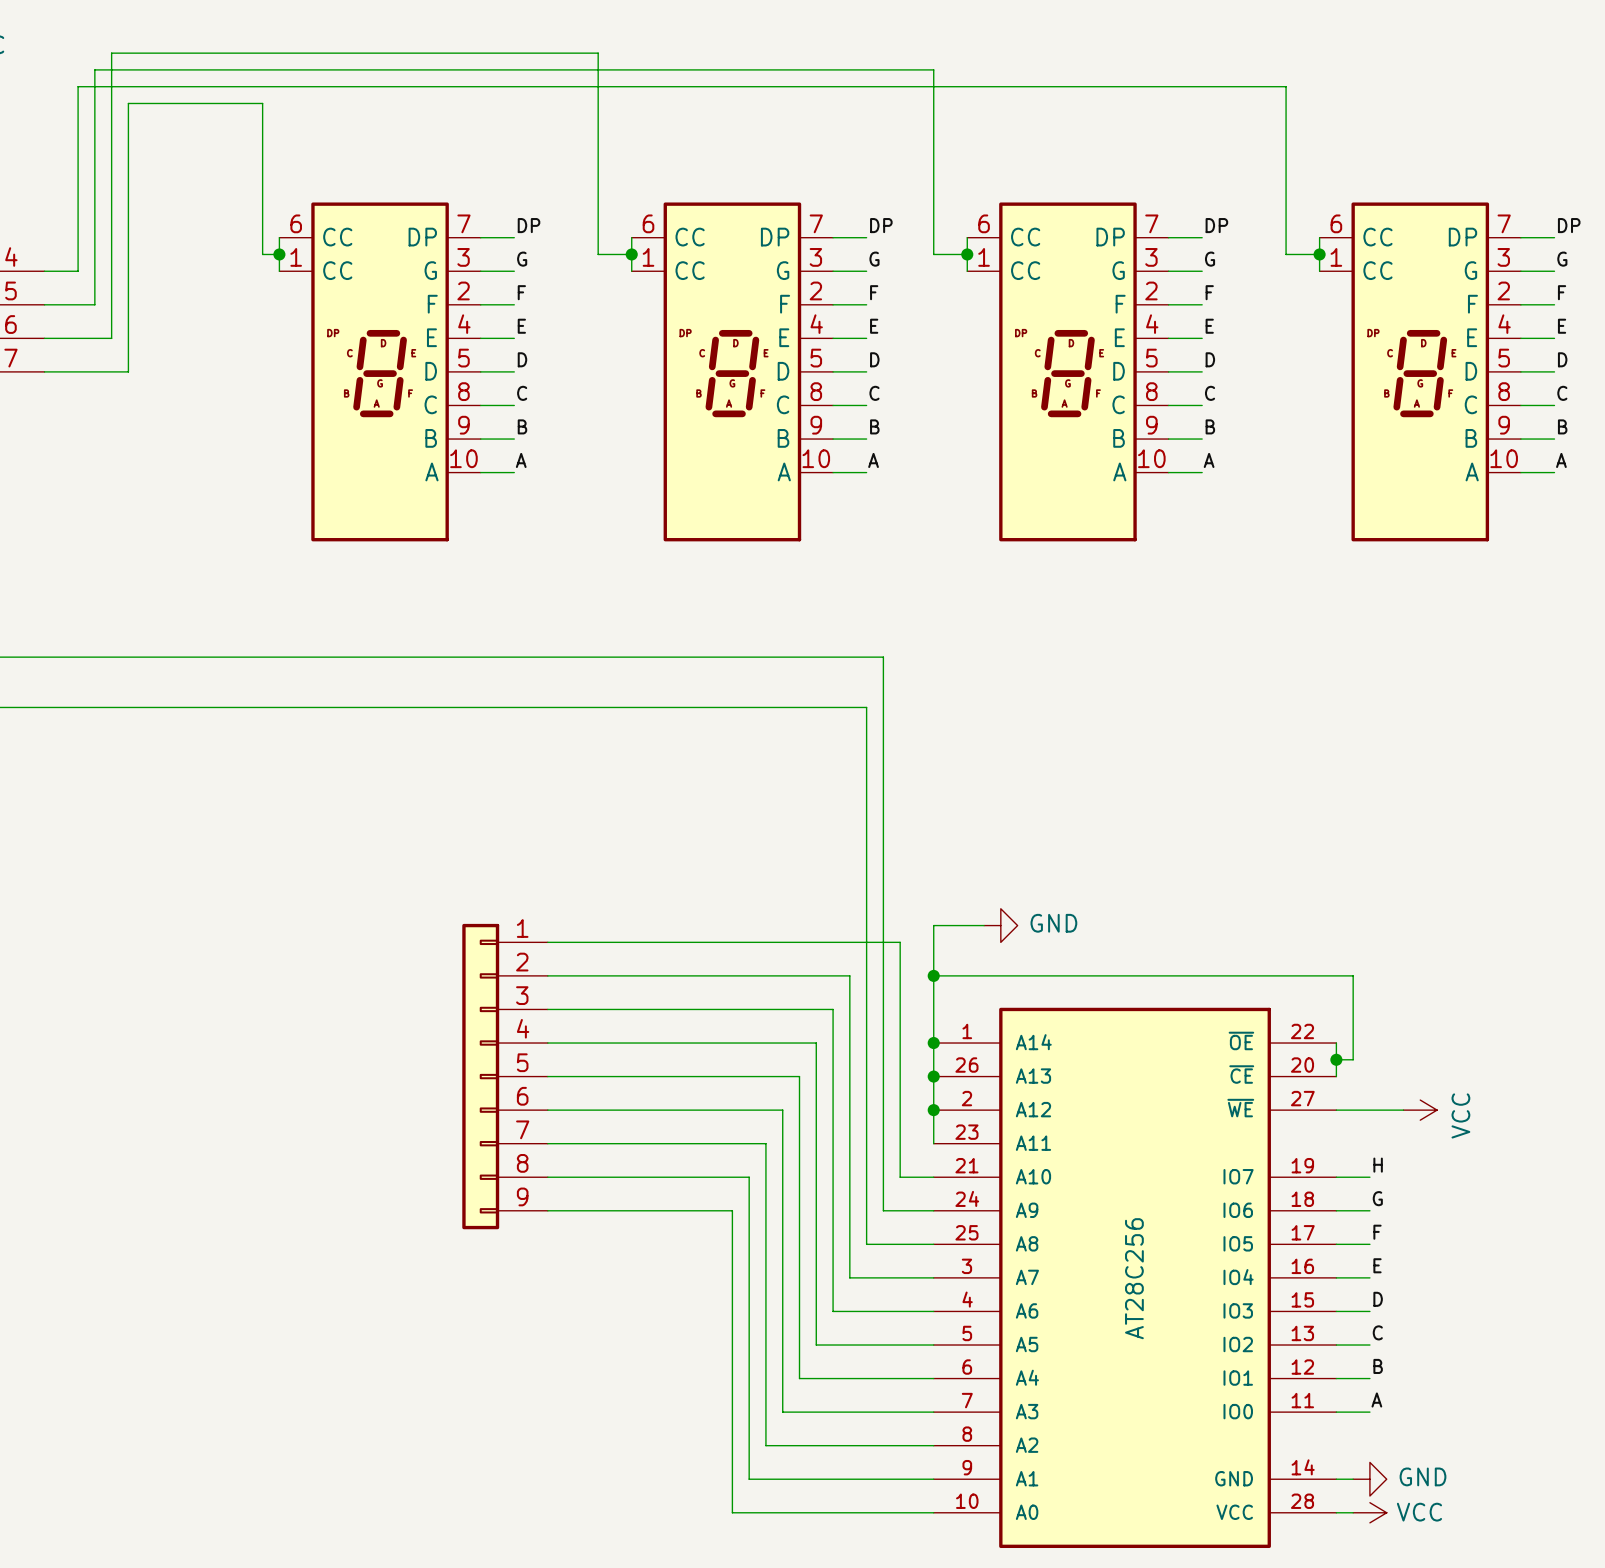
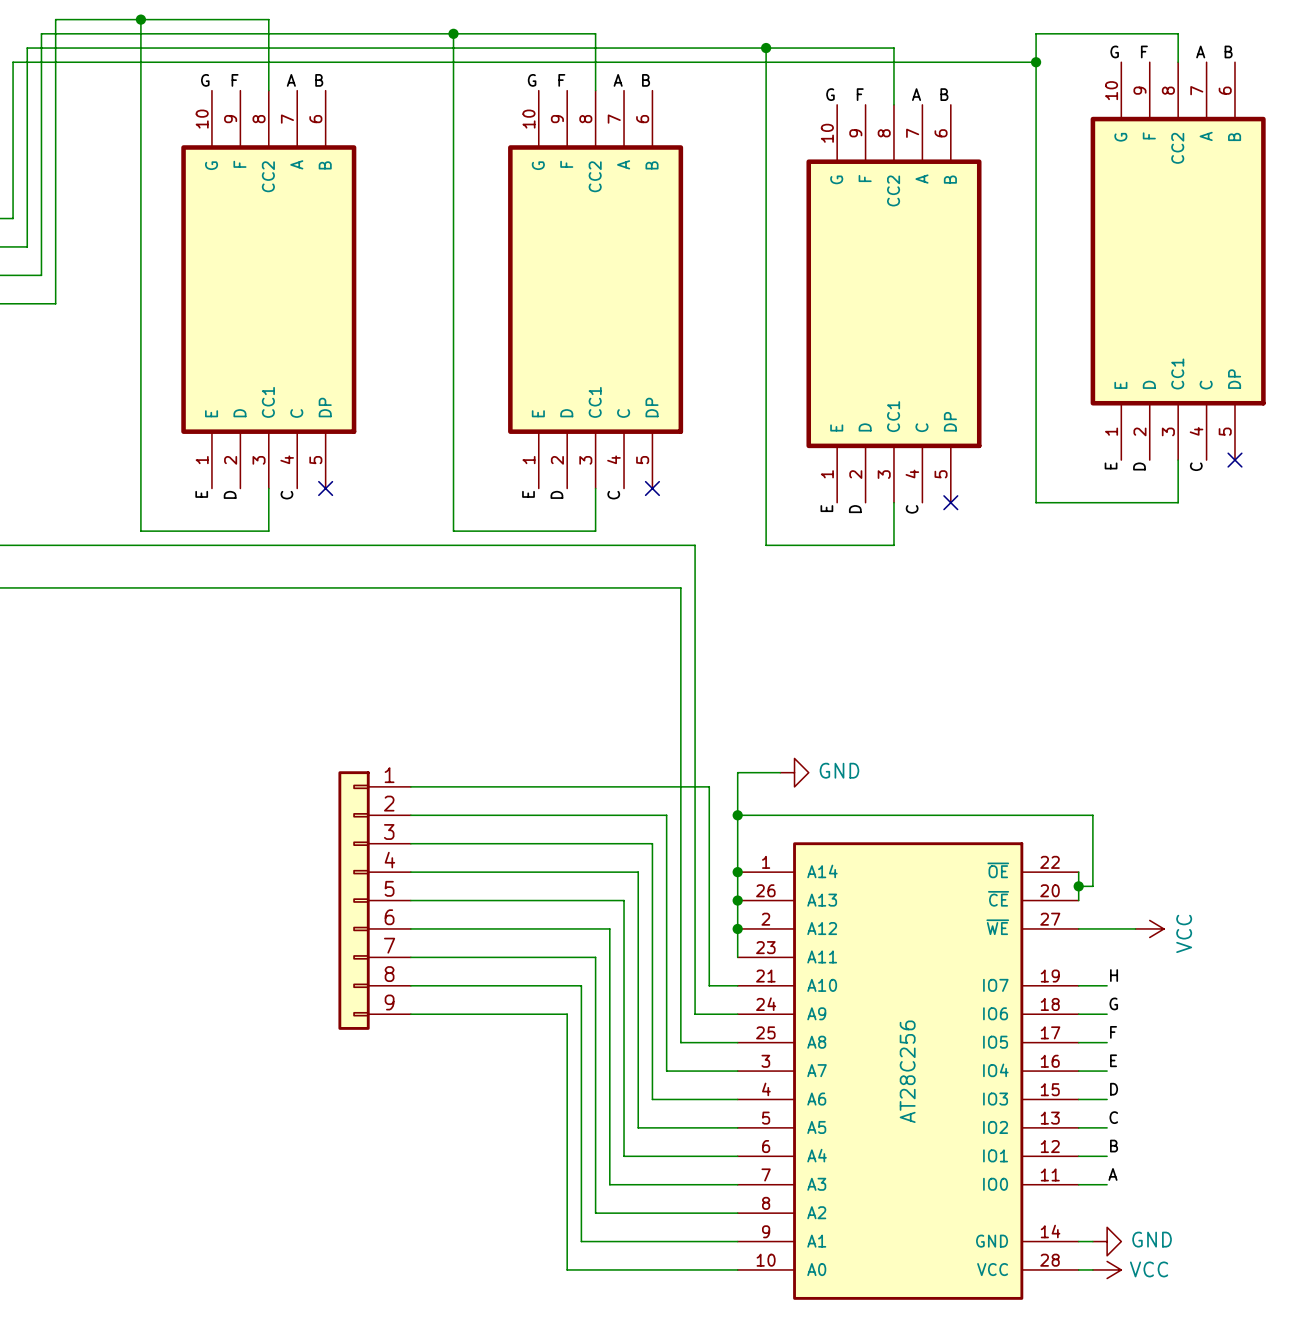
wire: none -> (140, 19) (140, 531) (268, 531) (268, 488)
junction: none -> (140, 19)
wire: none -> (453, 33) (595, 33) (595, 90)
junction: none -> (453, 33)
wire: (933, 69) (933, 254) (967, 254) -> (737, 48) (893, 48) (893, 104)
wire: none -> (766, 48) (766, 190)
junction: none -> (766, 48)
label: none -> G (1114, 51)
label: none -> F (1144, 51)
label: none -> A (1200, 51)
label: none -> B (1228, 51)
wire: none -> (1036, 62) (1036, 33) (1178, 33) (1178, 62)
junction: none -> (1036, 62)
wire: (128, 103) (262, 103) (262, 254) (279, 254) -> (55, 76) (55, 19) (268, 19) (268, 90)
label: none -> G (205, 80)
label: none -> F (235, 80)
label: none -> A (291, 80)
label: none -> B (319, 80)
label: none -> G (532, 80)
label: none -> F (561, 80)
label: none -> A (618, 80)
label: none -> B (646, 80)
label: none -> G (830, 94)
label: none -> F (860, 94)
label: none -> A (916, 94)
label: none -> B (944, 94)
label: DP (529, 225) -> none
label: DP (881, 225) -> none
label: DP (1216, 225) -> none
label: DP (1569, 225) -> none
wire: (480, 237) (514, 237) -> none
wire: (631, 237) (631, 271) -> none
wire: (1319, 237) (1319, 271) -> none
junction: (279, 254) -> none
wire: (598, 254) (631, 254) -> (453, 204) (453, 531) (595, 531) (595, 488)
junction: (631, 254) -> none
junction: (967, 254) -> none
wire: (1286, 254) (1319, 254) -> (1036, 204) (1036, 502) (1178, 502) (1178, 460)
junction: (1319, 254) -> none
label: G (522, 259) -> none
label: G (874, 259) -> none
label: G (1210, 259) -> none
label: G (1562, 259) -> none
wire: (480, 271) (514, 271) -> none
wire: none -> (766, 218) (766, 545) (893, 545) (893, 502)
label: F (521, 292) -> none
label: F (874, 292) -> none
label: F (1209, 292) -> none
label: F (1562, 292) -> none
wire: (480, 304) (514, 304) -> none
part: none -> (1178, 261)
label: E (521, 326) -> none
label: E (874, 326) -> none
label: E (1209, 326) -> none
label: E (1562, 326) -> none
wire: (480, 338) (514, 338) -> none
part: none -> (268, 289)
part: none -> (595, 289)
label: D (522, 359) -> none
label: D (874, 359) -> none
label: D (1210, 359) -> none
label: D (1562, 359) -> none
part: (380, 371) -> none
wire: (480, 371) (514, 371) -> none
part: (732, 371) -> none
part: (1067, 371) -> none
part: none -> (893, 303)
part: (1420, 371) -> none
label: C (522, 393) -> none
label: C (874, 393) -> none
label: C (1210, 393) -> none
label: C (1562, 393) -> none
wire: (480, 405) (514, 405) -> none
label: B (522, 426) -> none
label: B (874, 426) -> none
label: B (1210, 426) -> none
label: B (1562, 426) -> none
wire: (480, 439) (514, 439) -> none
label: A (521, 460) -> none
label: A (873, 460) -> none
label: A (1209, 460) -> none
label: A (1561, 460) -> none
wire: (480, 472) (514, 472) -> none
no-connect mark: none -> (1234, 460)
label: none -> E (1111, 465)
label: none -> D (1139, 466)
label: none -> C (1196, 466)
no-connect mark: none -> (325, 488)
no-connect mark: none -> (652, 488)
label: none -> E (201, 494)
label: none -> E (528, 494)
label: none -> D (230, 494)
label: none -> C (286, 495)
label: none -> D (556, 494)
label: none -> C (613, 495)
no-connect mark: none -> (950, 502)
label: none -> E (826, 508)
label: none -> D (855, 509)
label: none -> C (912, 509)

